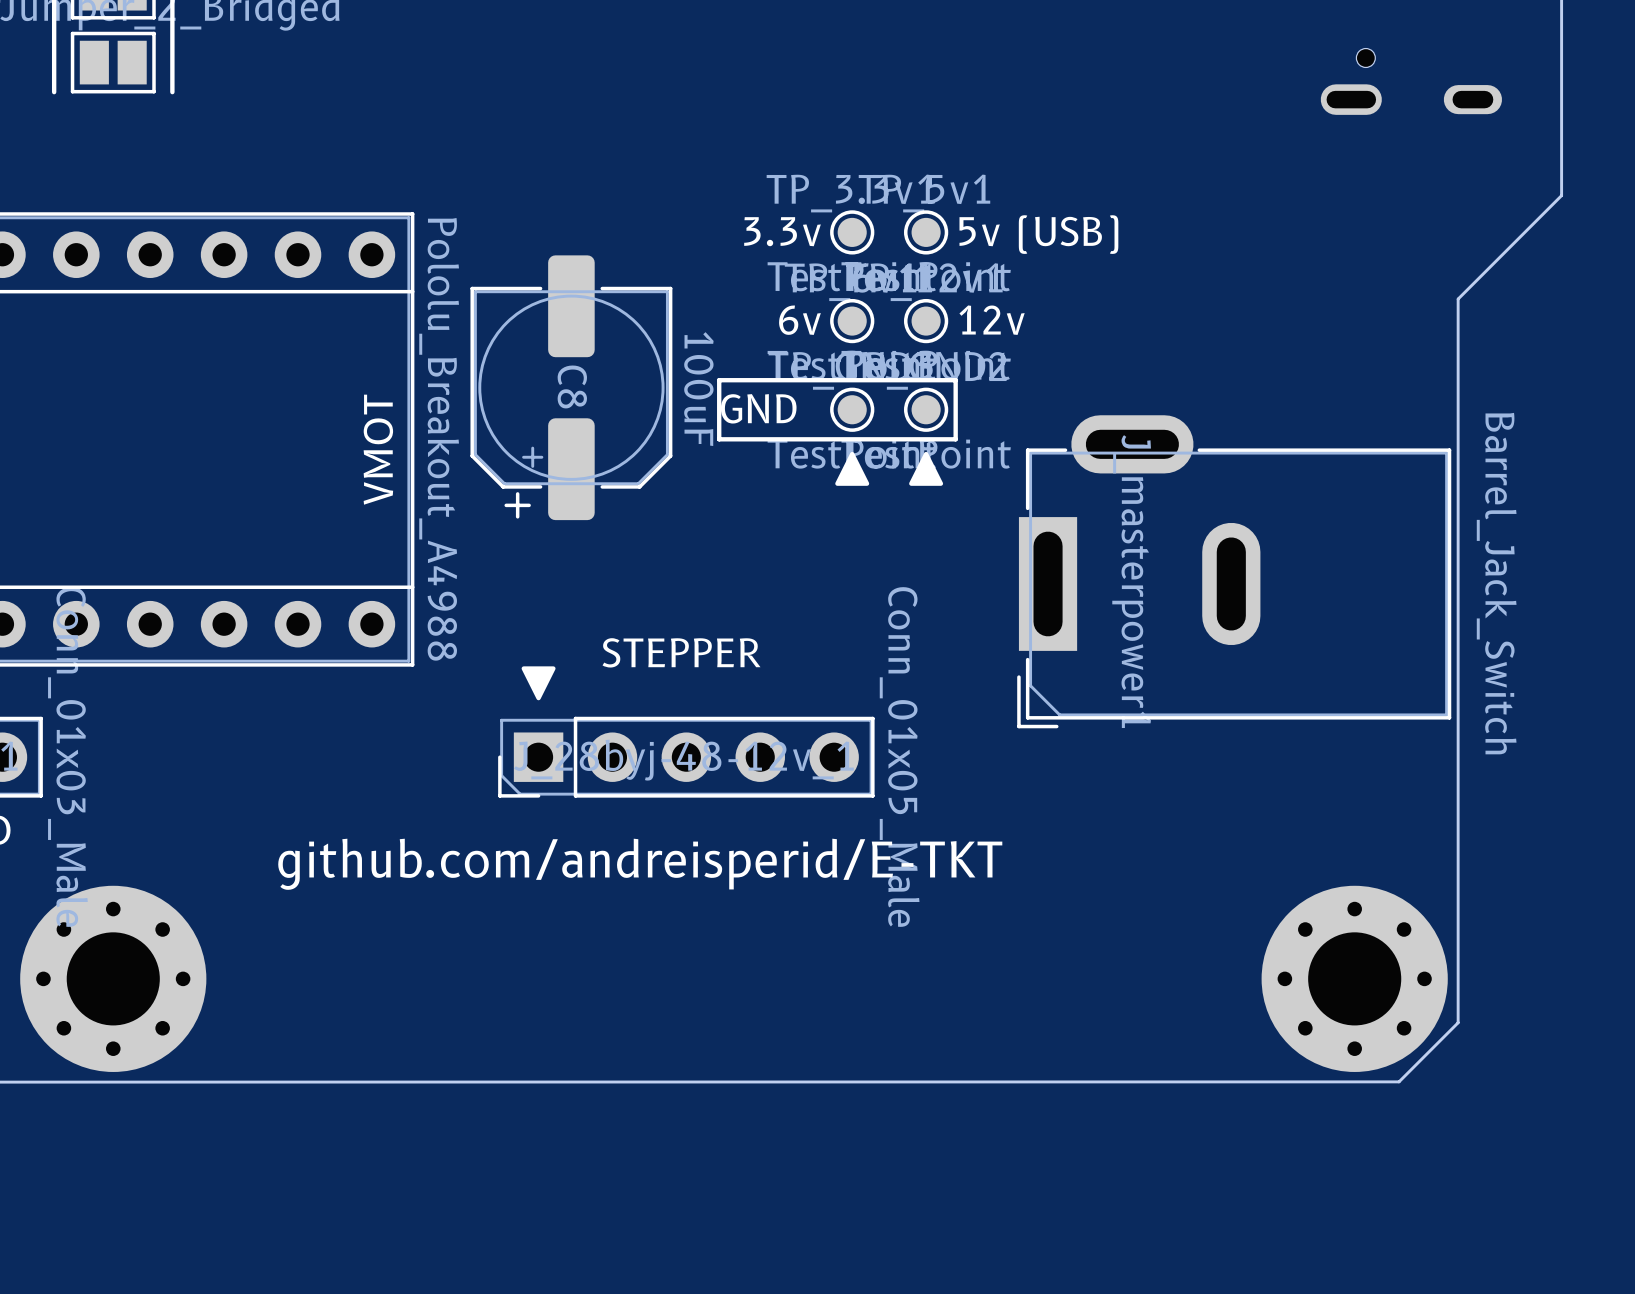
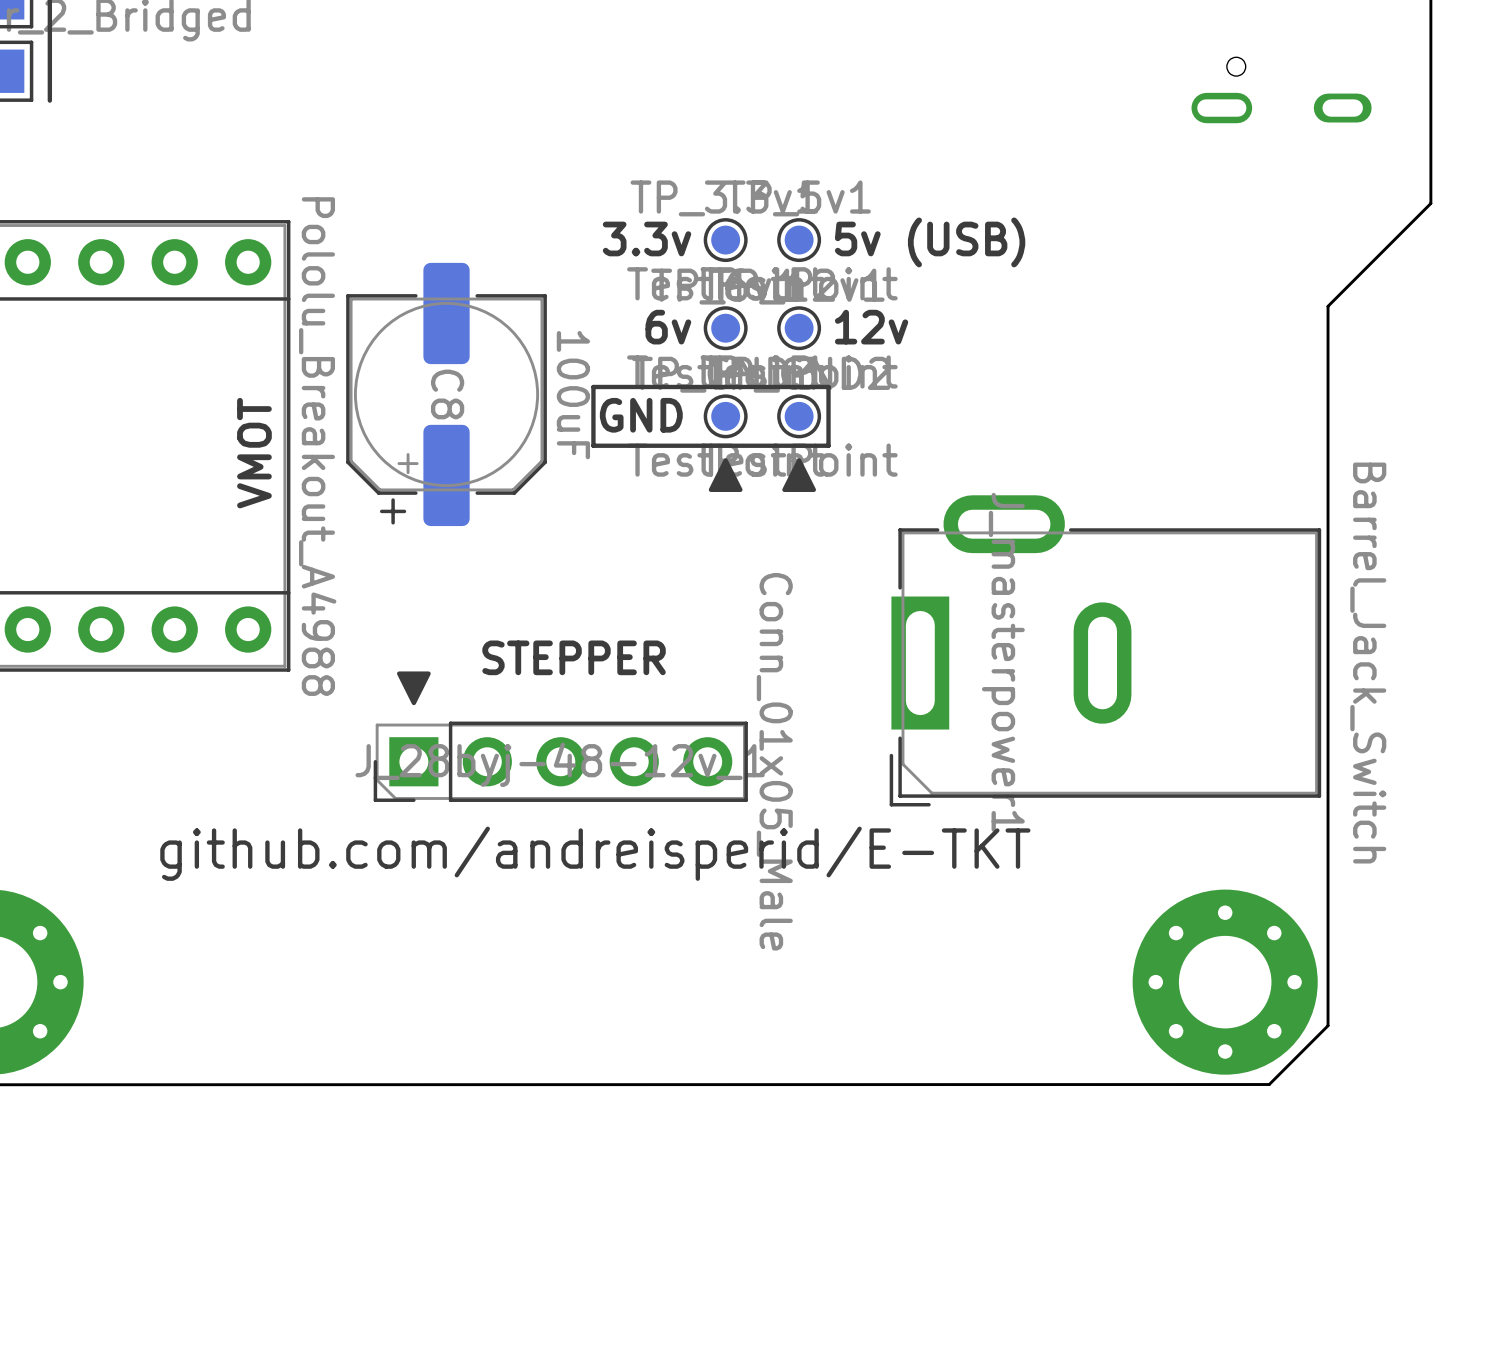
J_masterpower1 position: (1234, 571) -> (1105, 650)
text position: github.com/andreisperid/E-TKT (640, 864) -> github.com/andreisperid/E-TKT (595, 853)

